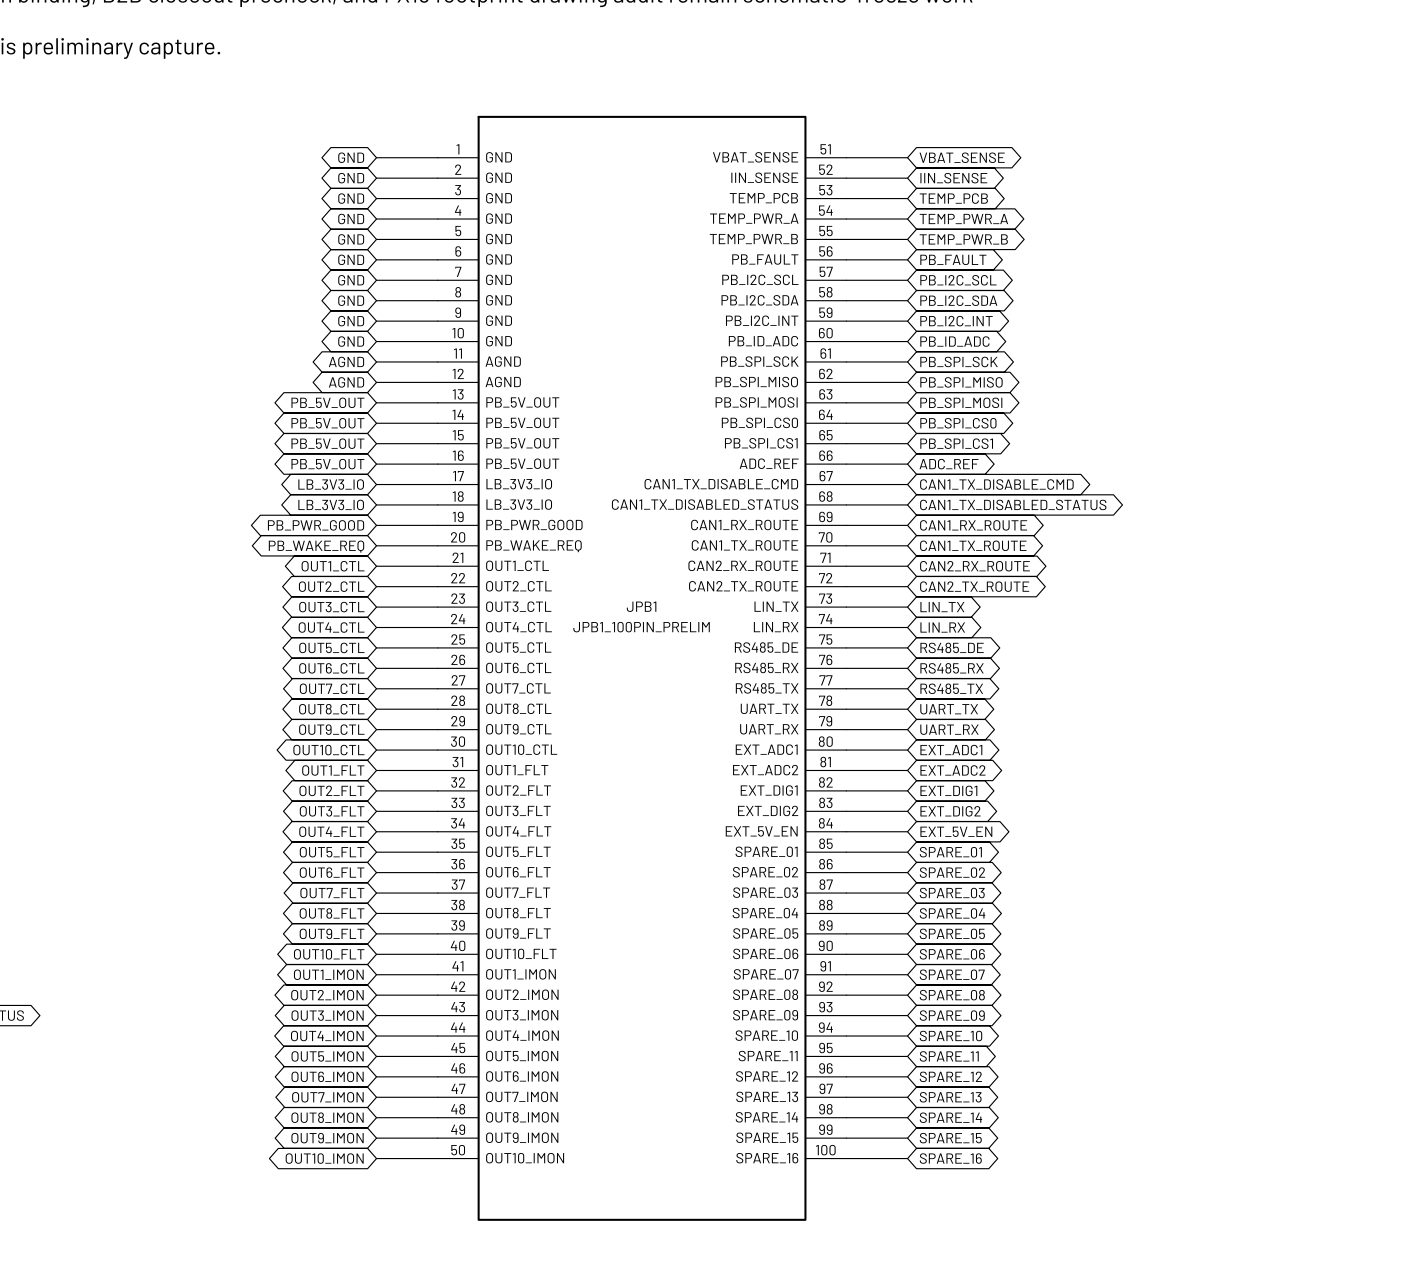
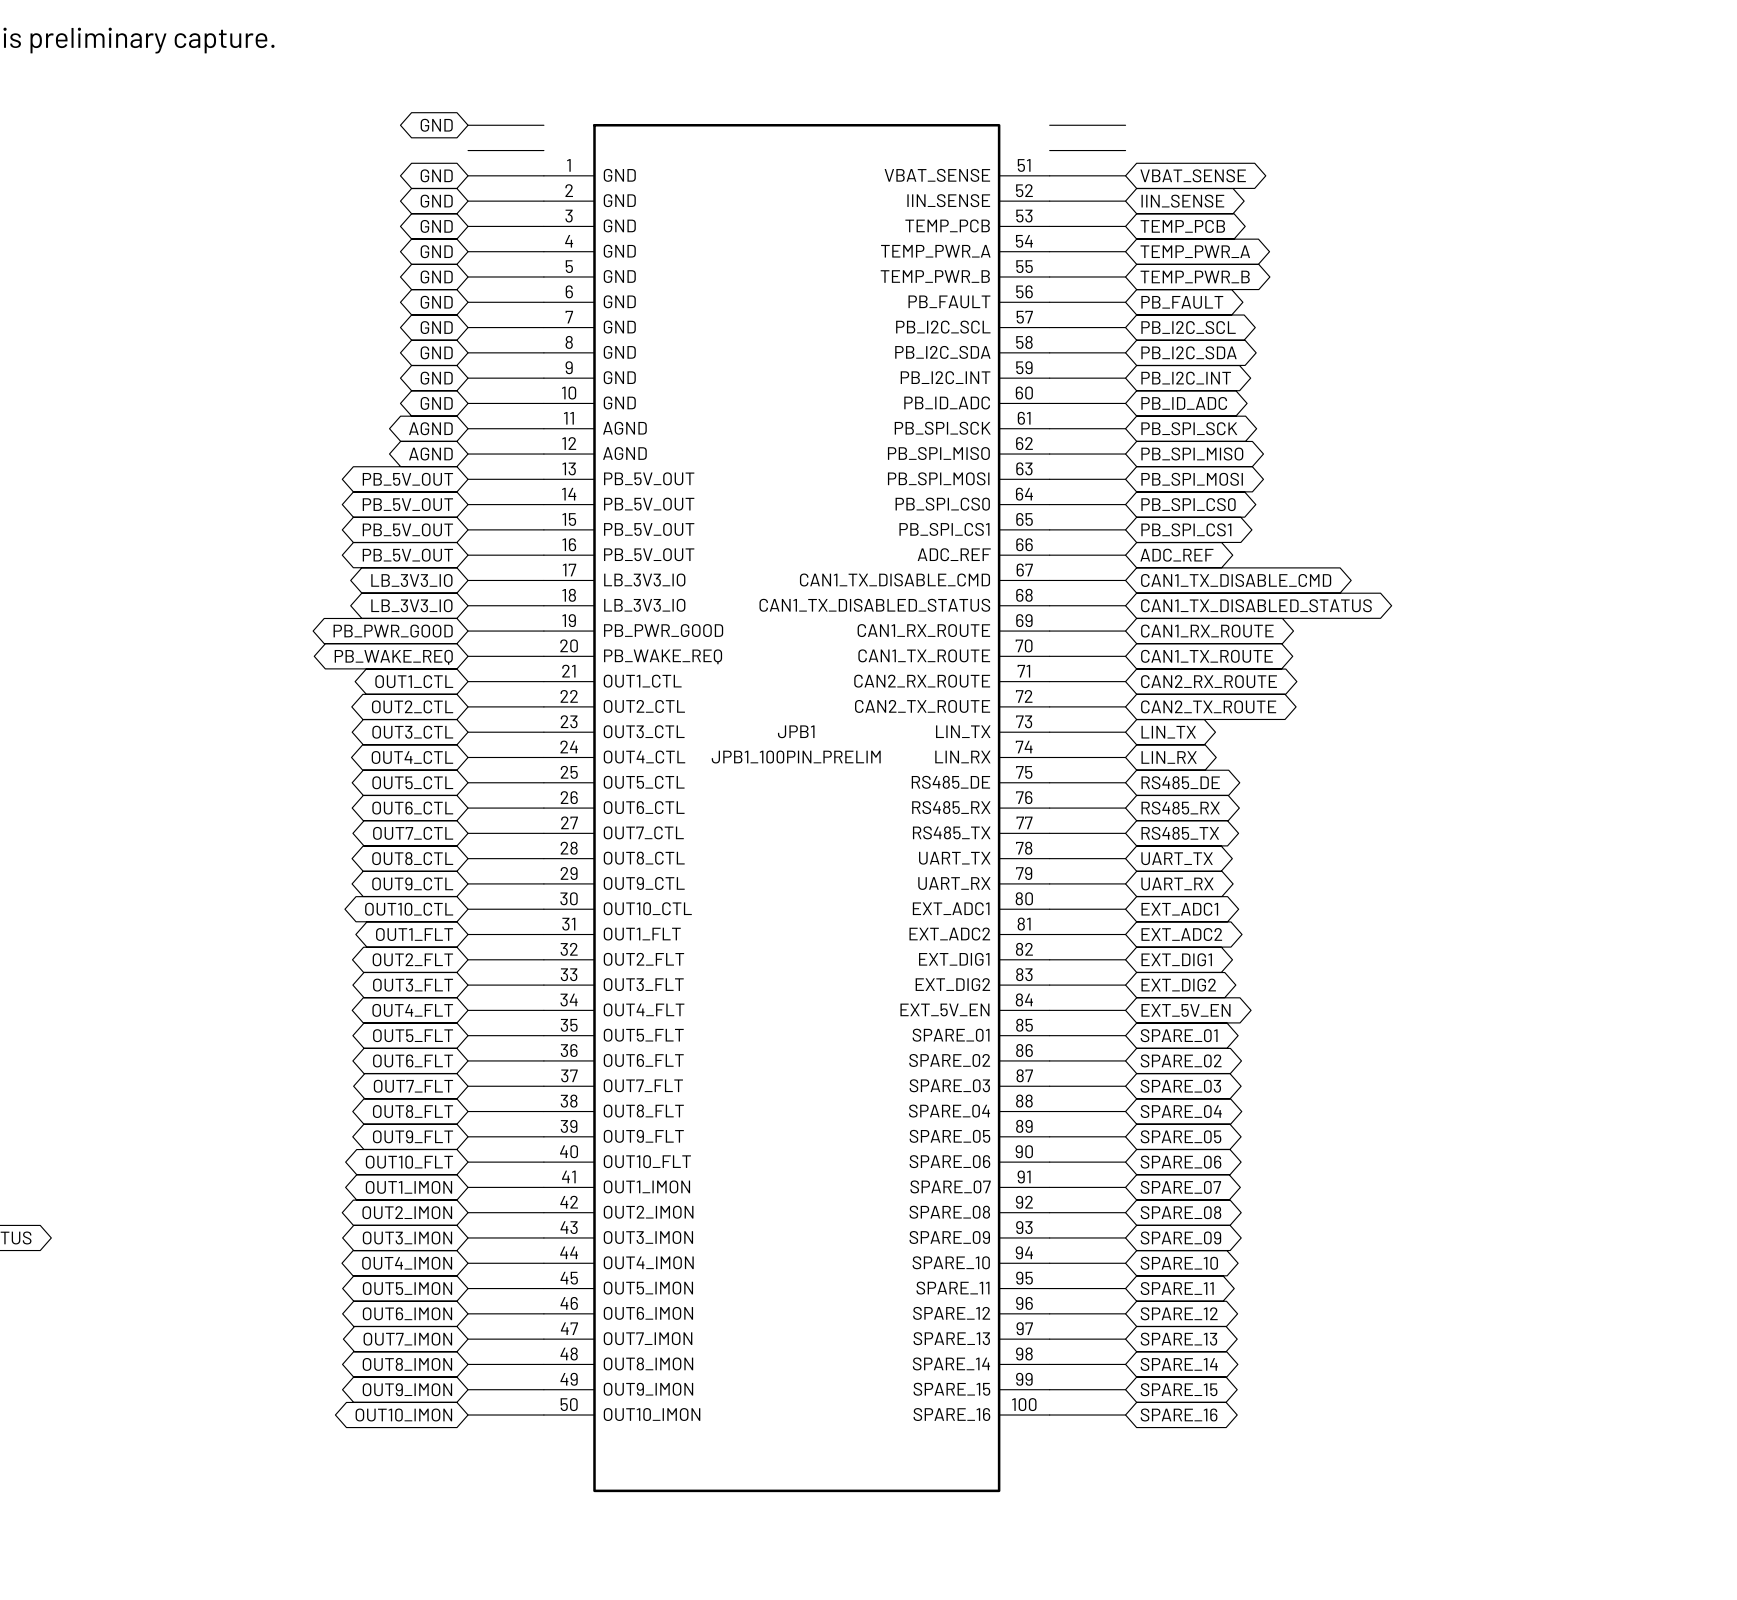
global label: none -> GND (436, 125)
wire: none -> (468, 125) (543, 125)
wire: none -> (1049, 125) (1125, 125)
wire: none -> (468, 150) (543, 150)
wire: none -> (1049, 150) (1125, 150)

